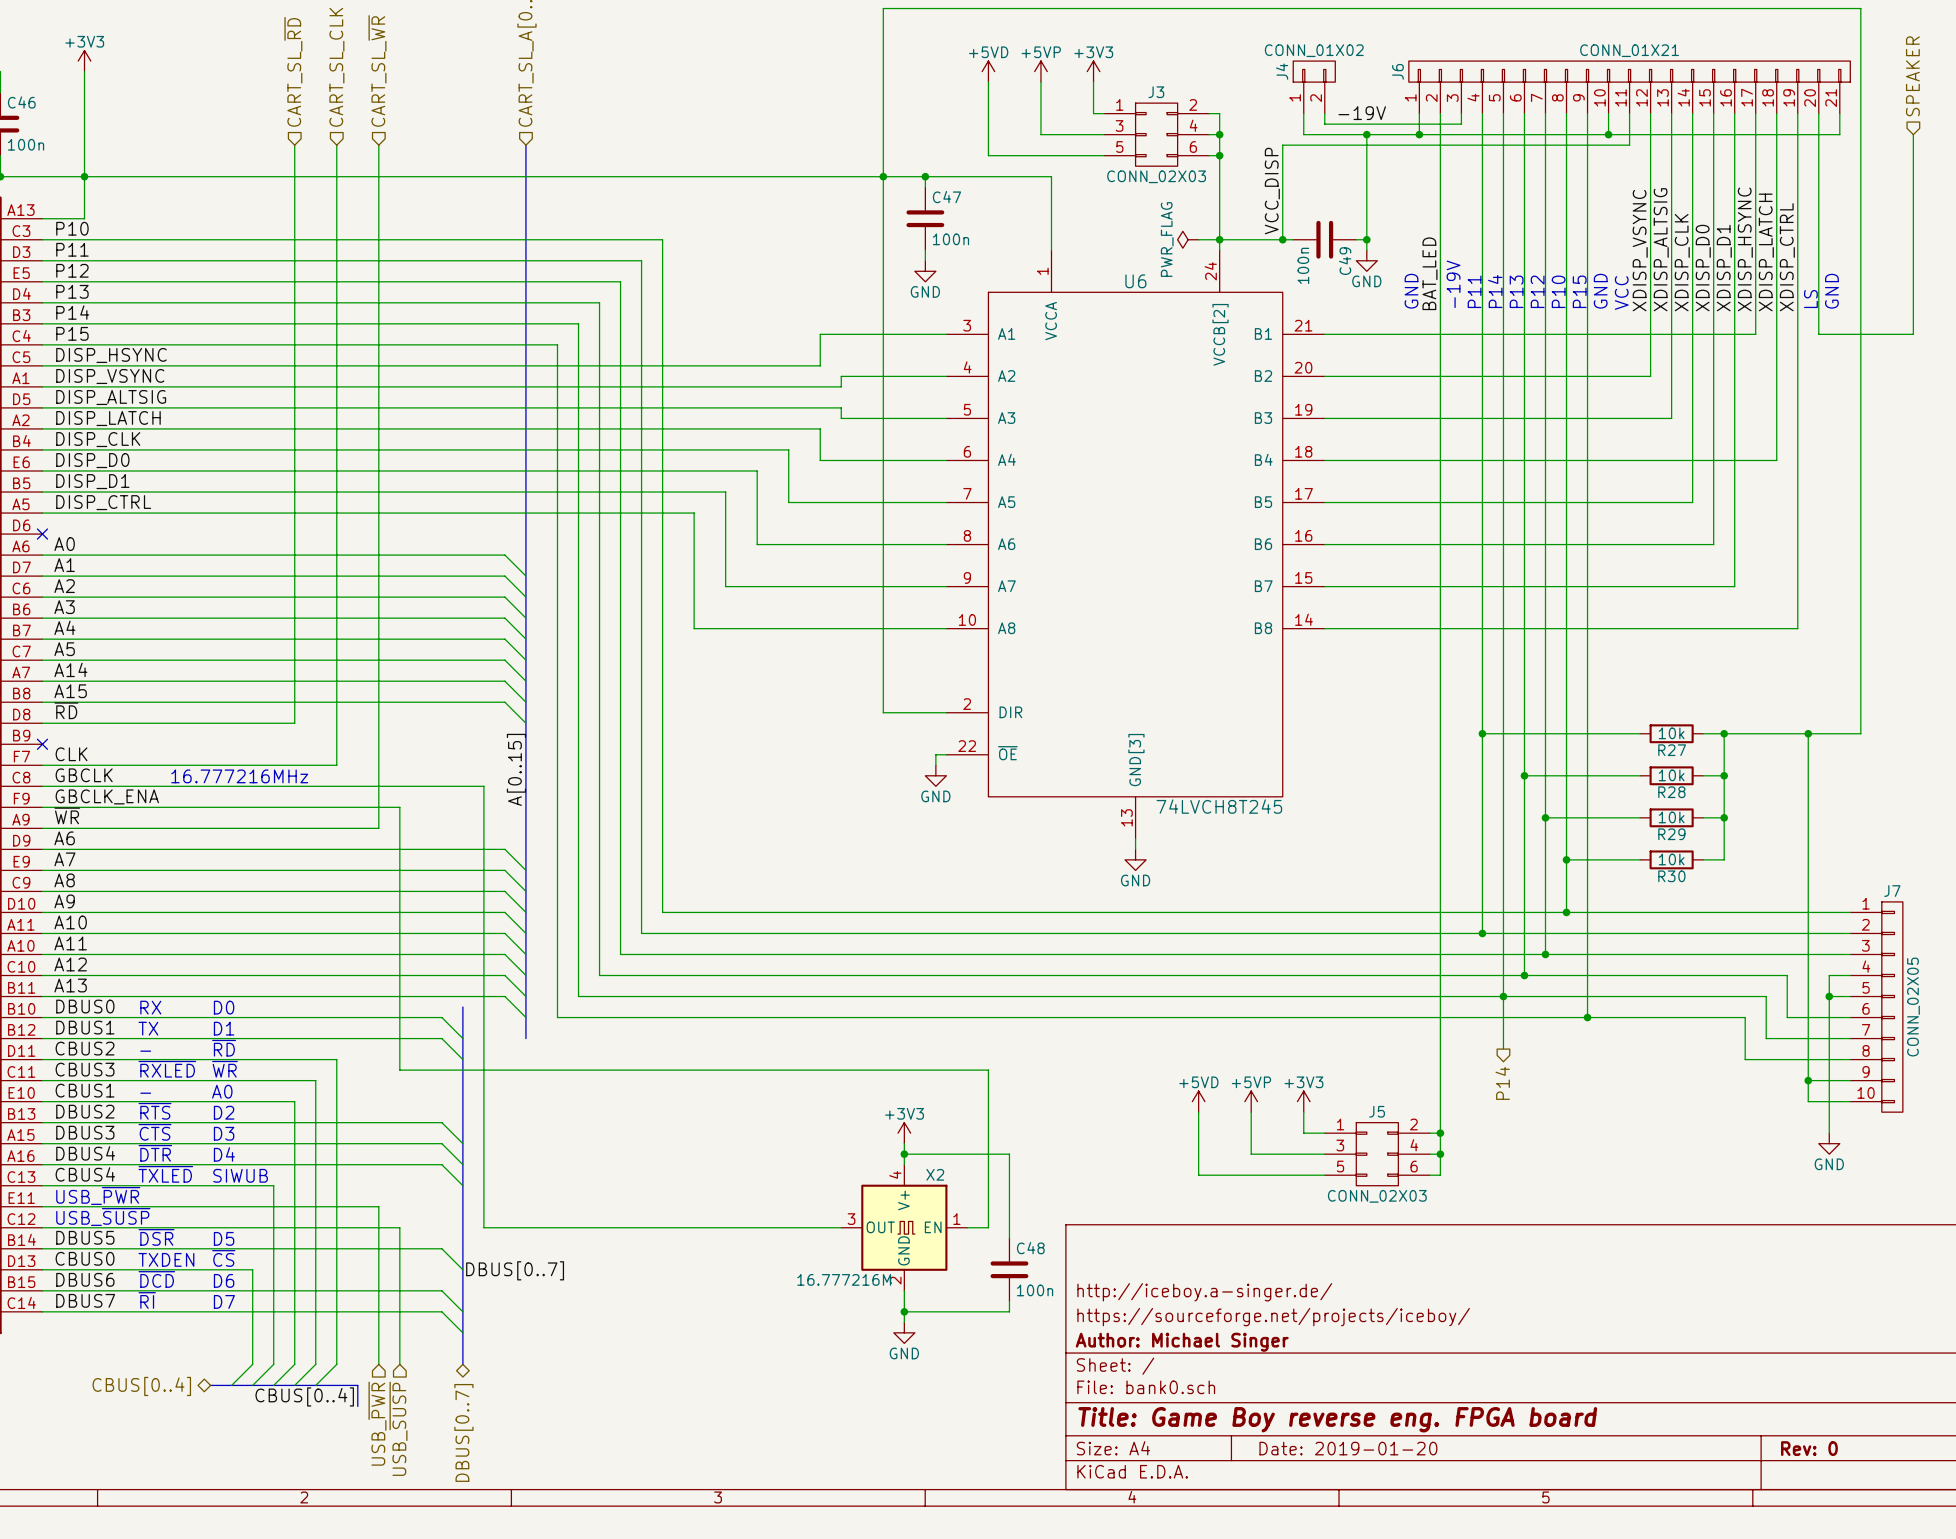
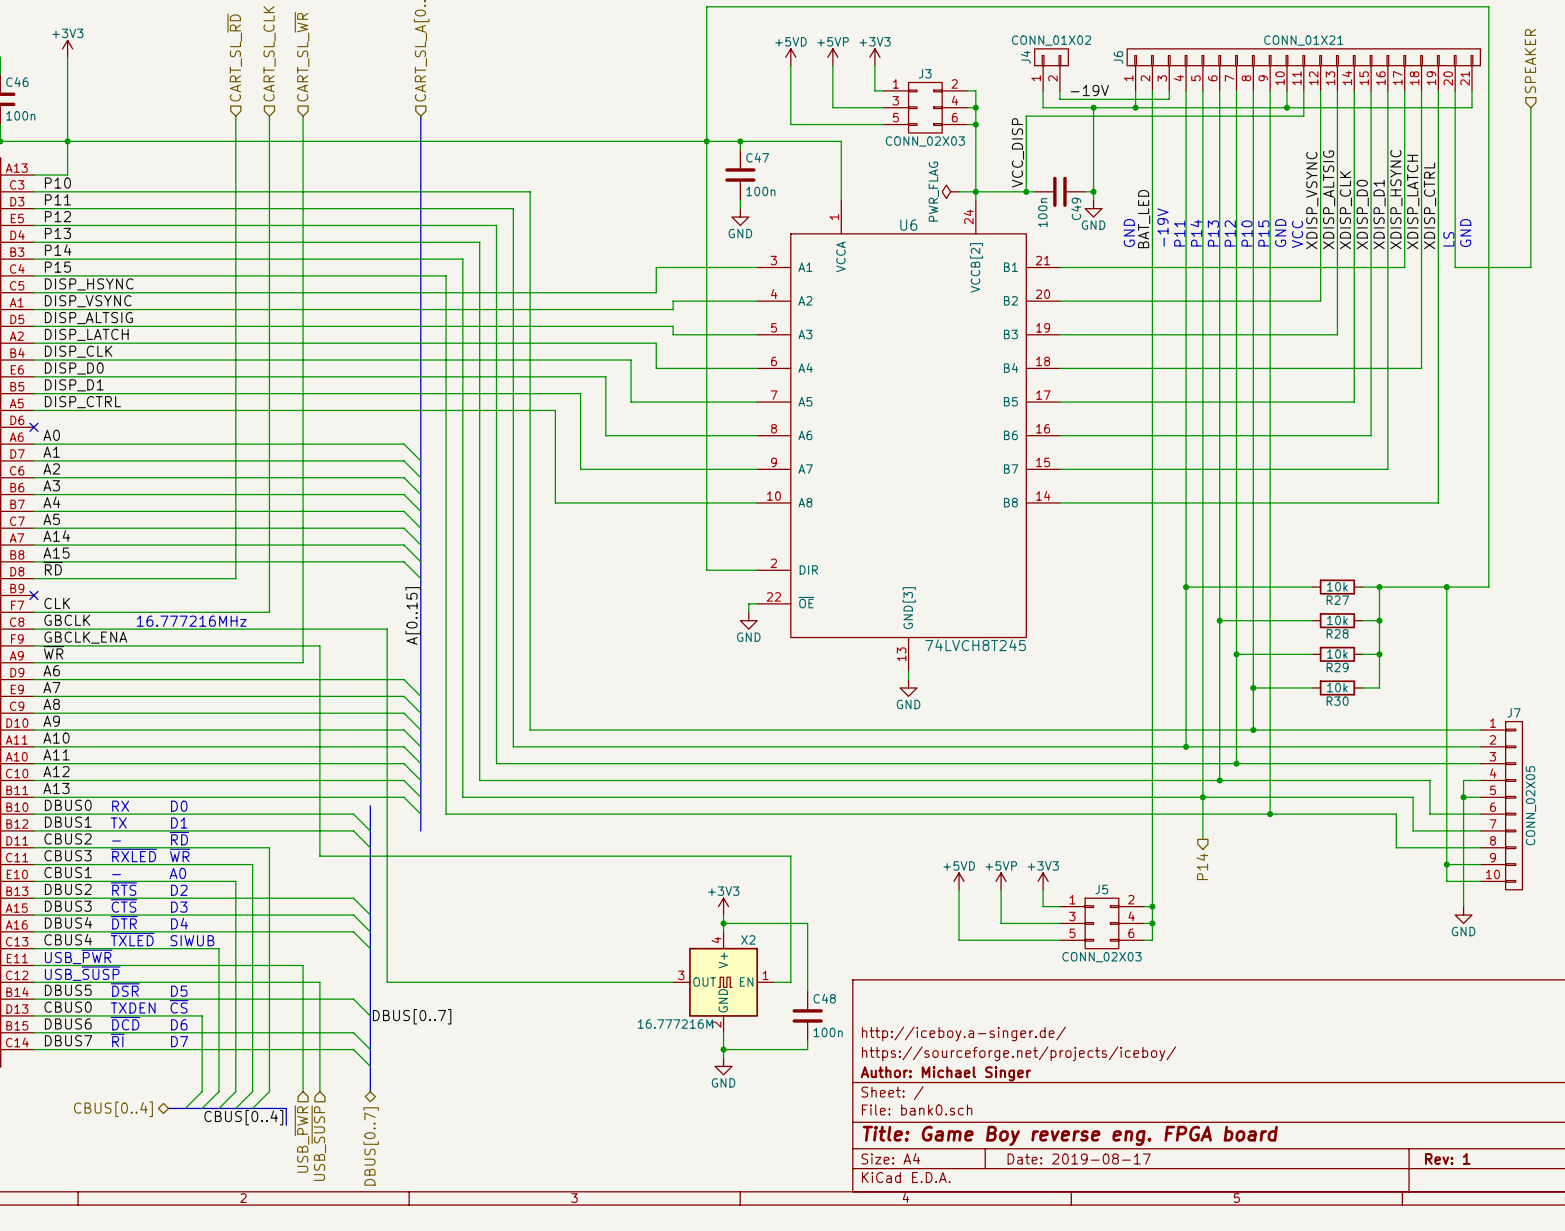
title block: Date: 2019-01-20 (1348, 1448) -> Date: 2019-08-17 (1079, 1158)
title block: Rev: 0 (1809, 1448) -> Rev: 1 (1447, 1158)

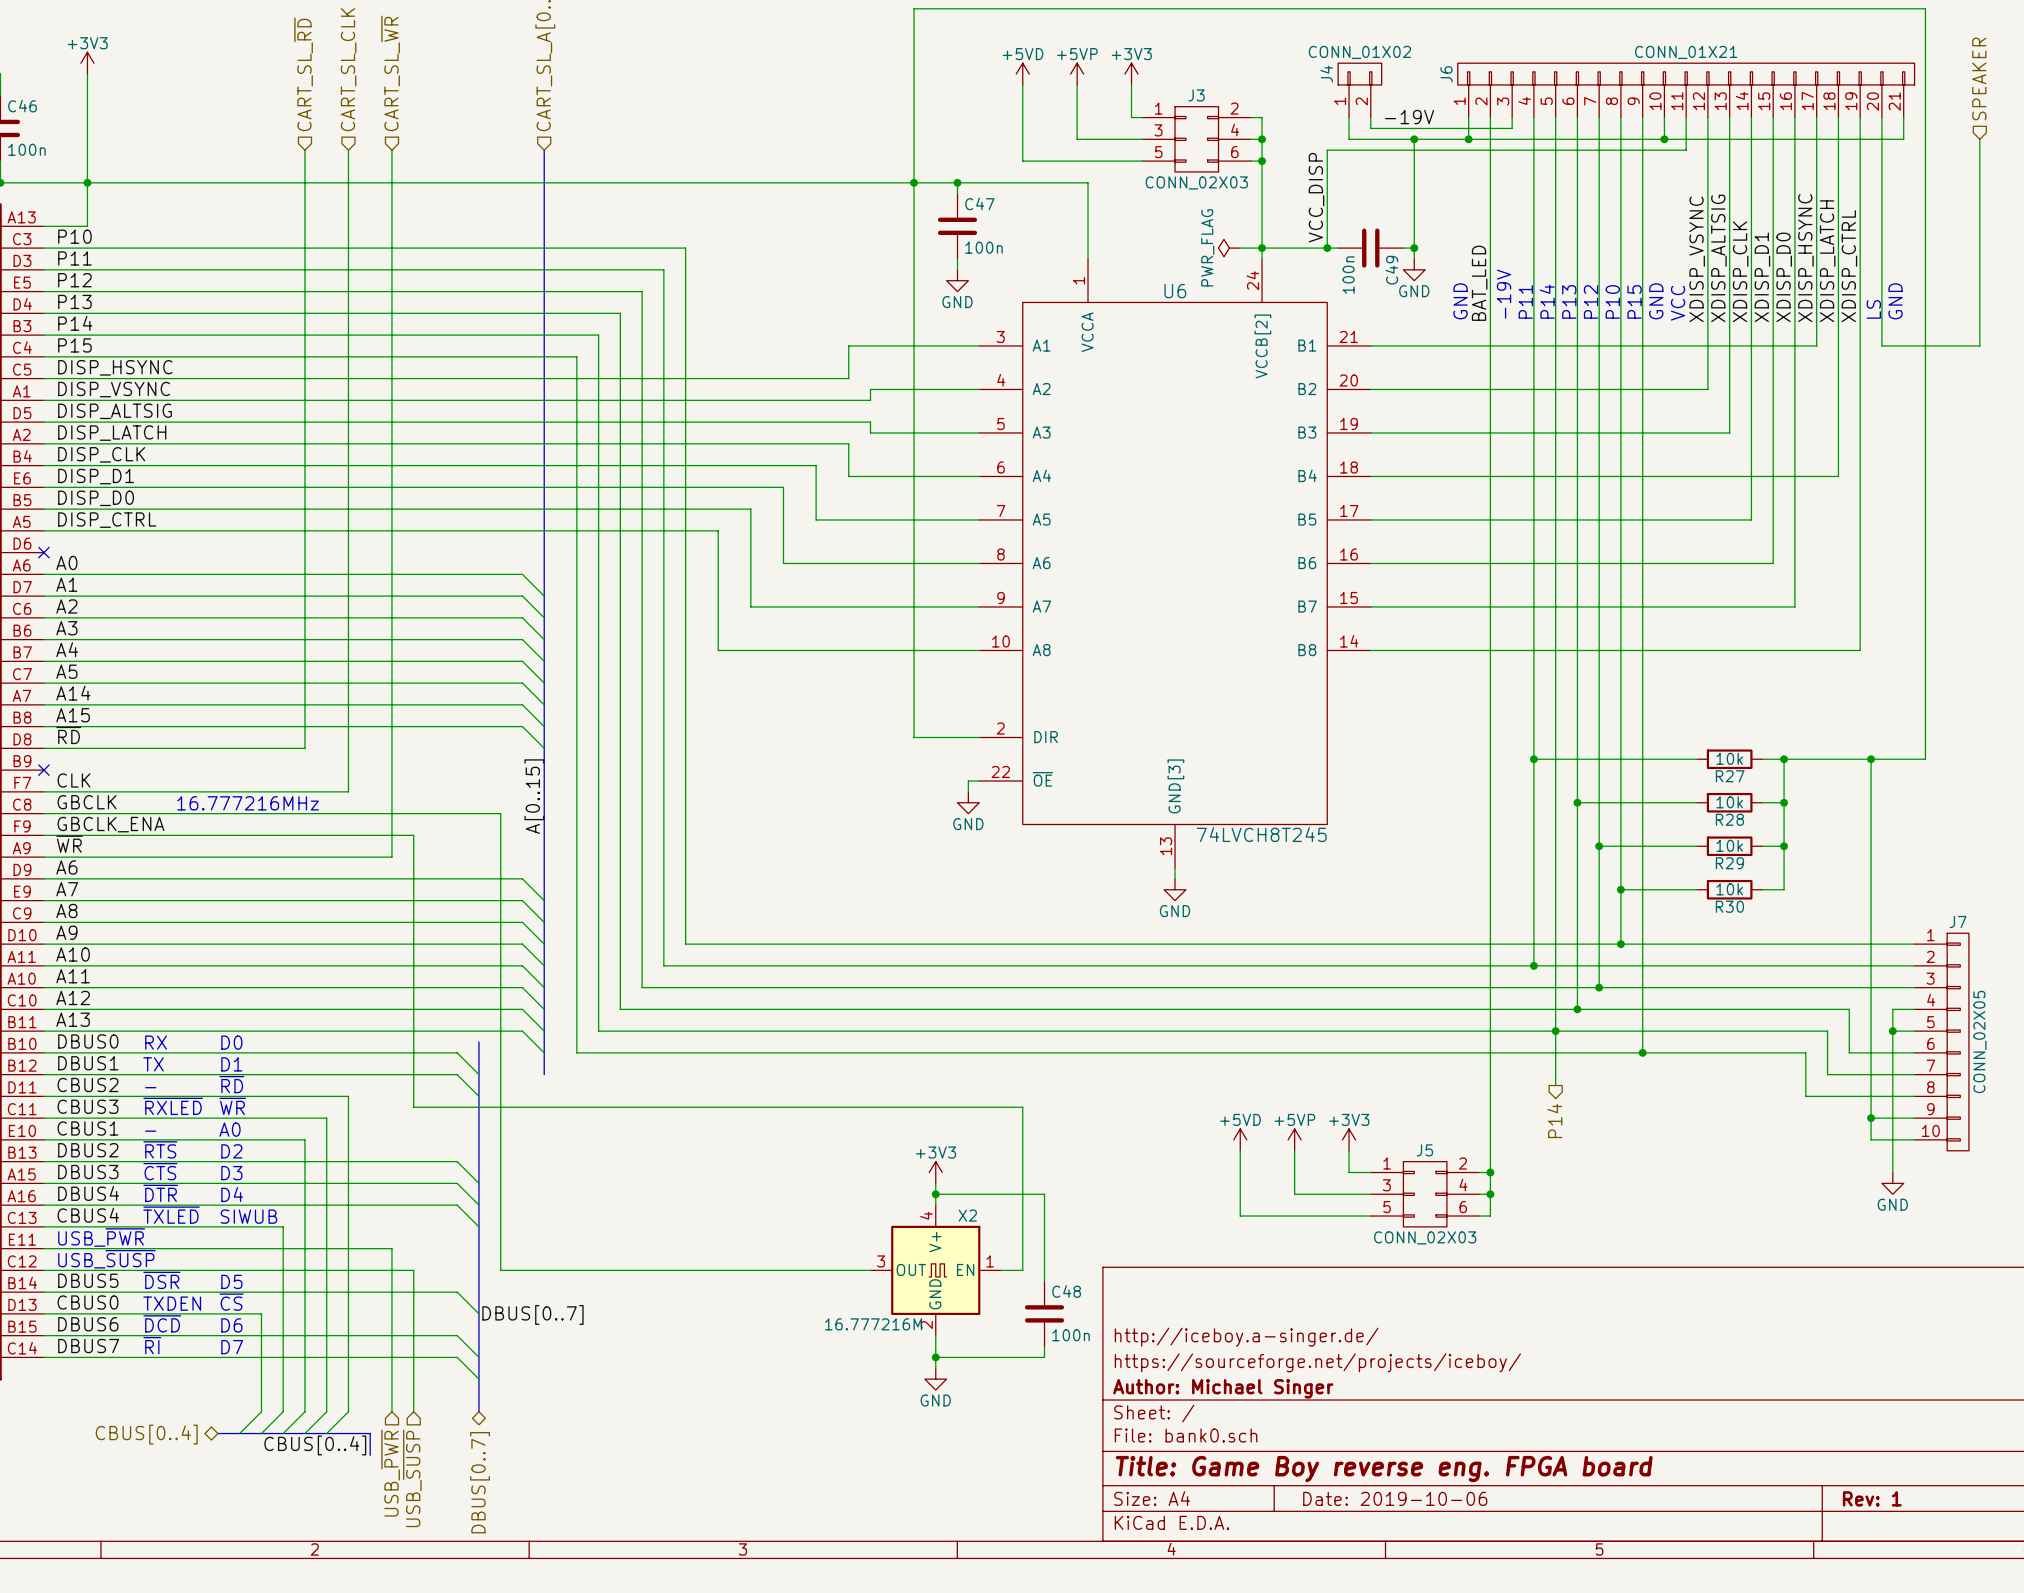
label: XDISP_D0 (1362, 214) -> XDISP_D1 (1762, 277)
label: XDISP_D1 (1379, 214) -> XDISP_D0 (1784, 277)
label: DISP_D0 (74, 368) -> DISP_D1 (96, 476)
label: DISP_D1 (74, 385) -> DISP_D0 (96, 498)
title block: Date: 2019-08-17 (1079, 1158) -> Date: 2019-10-06 (1395, 1498)

